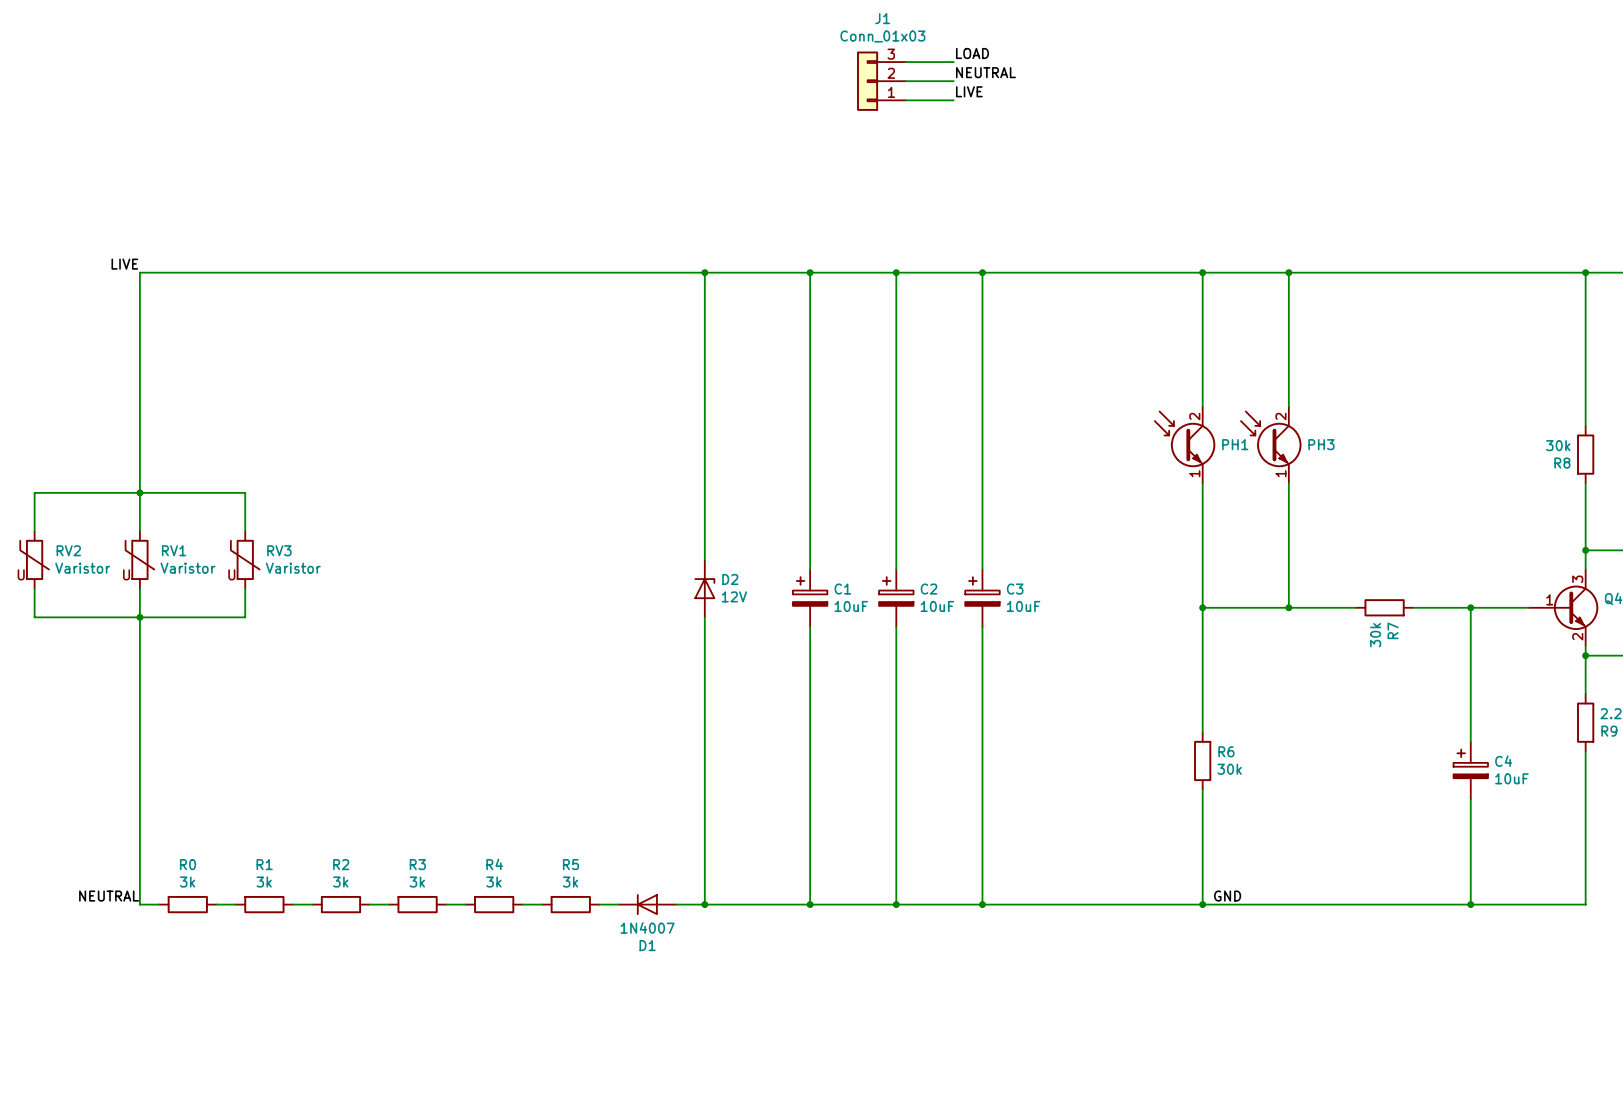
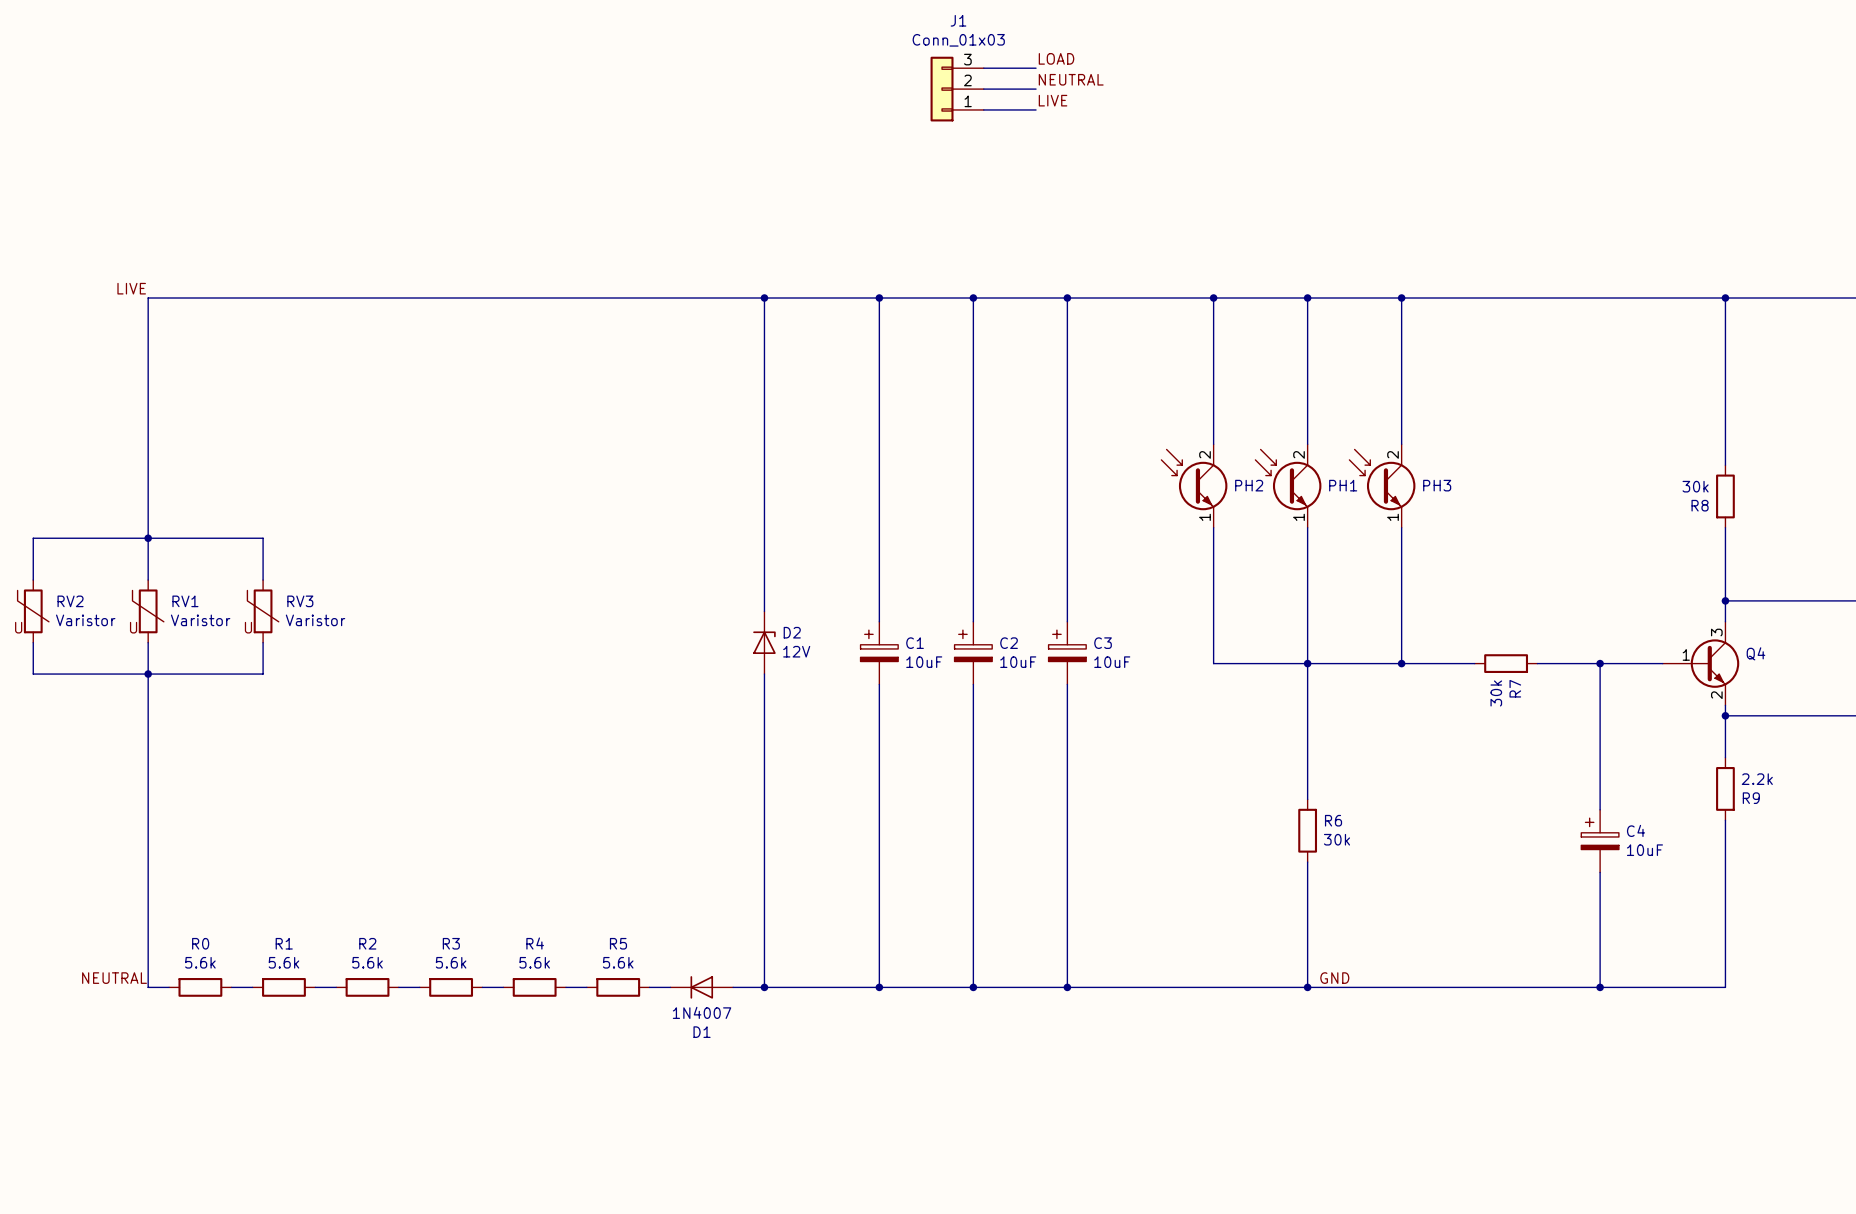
wire: none -> (1213, 298) (1213, 444)
junction: none -> (1213, 298)
PH2: none -> (1194, 486)
wire: none -> (1213, 527) (1213, 663) (1307, 663)
R0 value: 3k (187, 882) -> 5.6k (200, 962)
R1 value: 3k (264, 882) -> 5.6k (283, 962)
R2 value: 3k (340, 882) -> 5.6k (367, 962)
R3 value: 3k (417, 882) -> 5.6k (451, 962)
R4 value: 3k (493, 882) -> 5.6k (534, 962)
R5 value: 3k (570, 882) -> 5.6k (618, 962)

